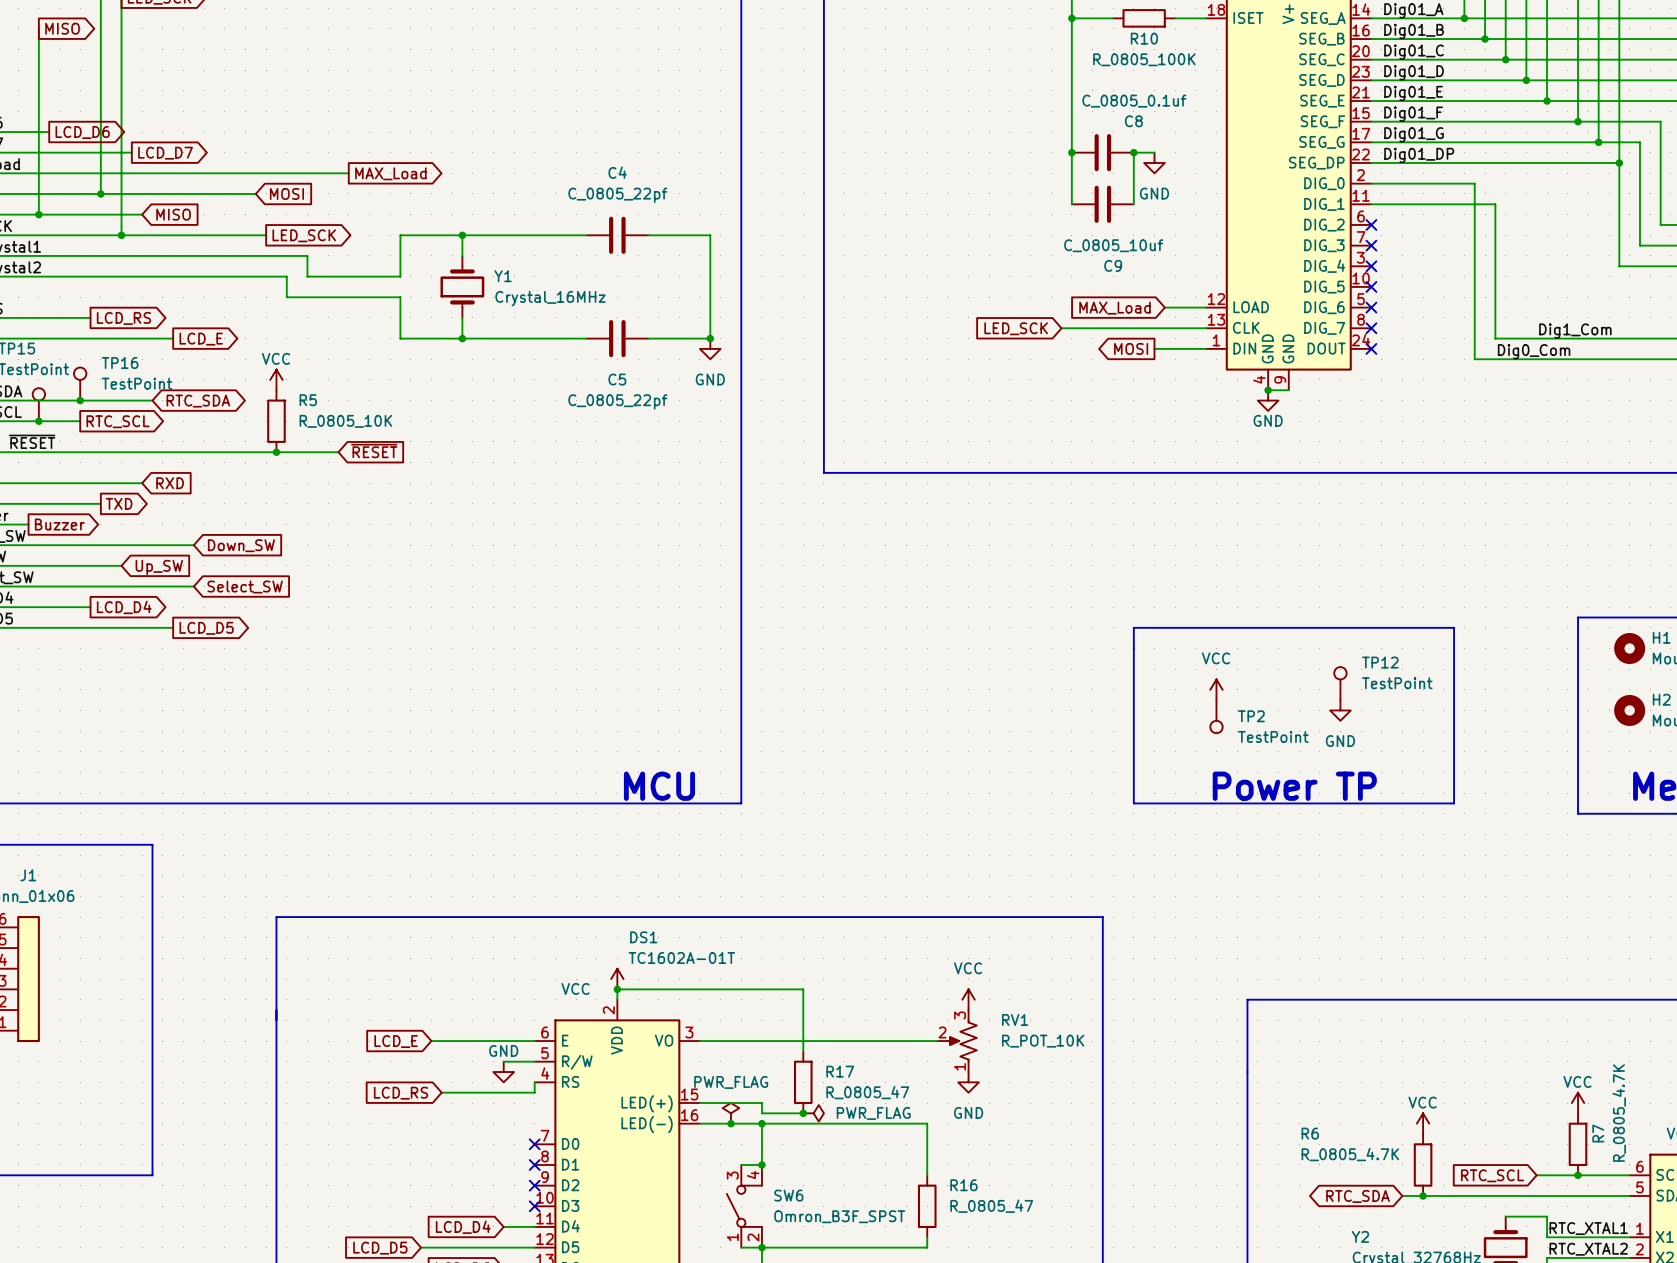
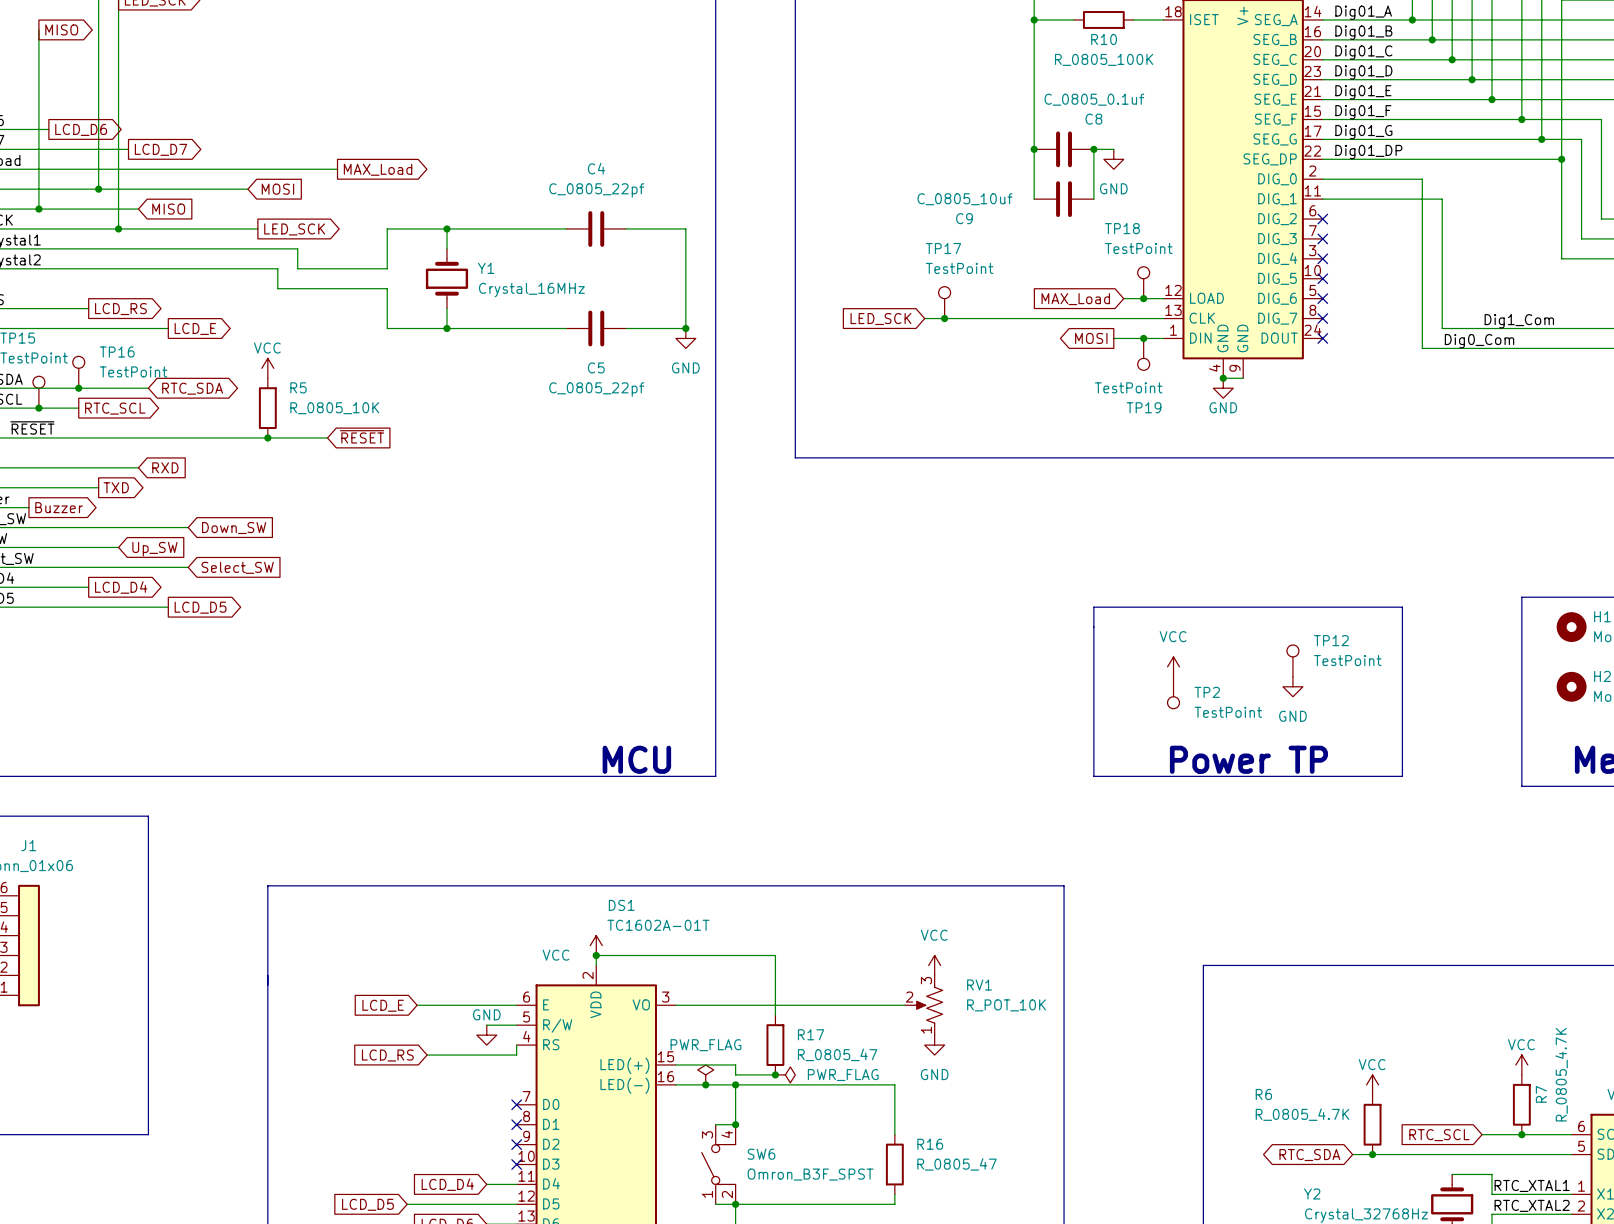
C9 value position: C_0805_10uf (1113, 245) -> C_0805_10uf (964, 199)
C9 name position: C9 (1113, 265) -> C9 (964, 218)
TP18: none -> TestPoint (1143, 282)
junction: none -> (1143, 298)
TP17: none -> TestPoint (944, 302)
wire: none -> (924, 318) (1024, 318)
junction: none -> (944, 318)
global label position: LED_SCK (1016, 328) -> LED_SCK (880, 319)
junction: none -> (1143, 338)
TP19: none -> TestPoint (1143, 354)

